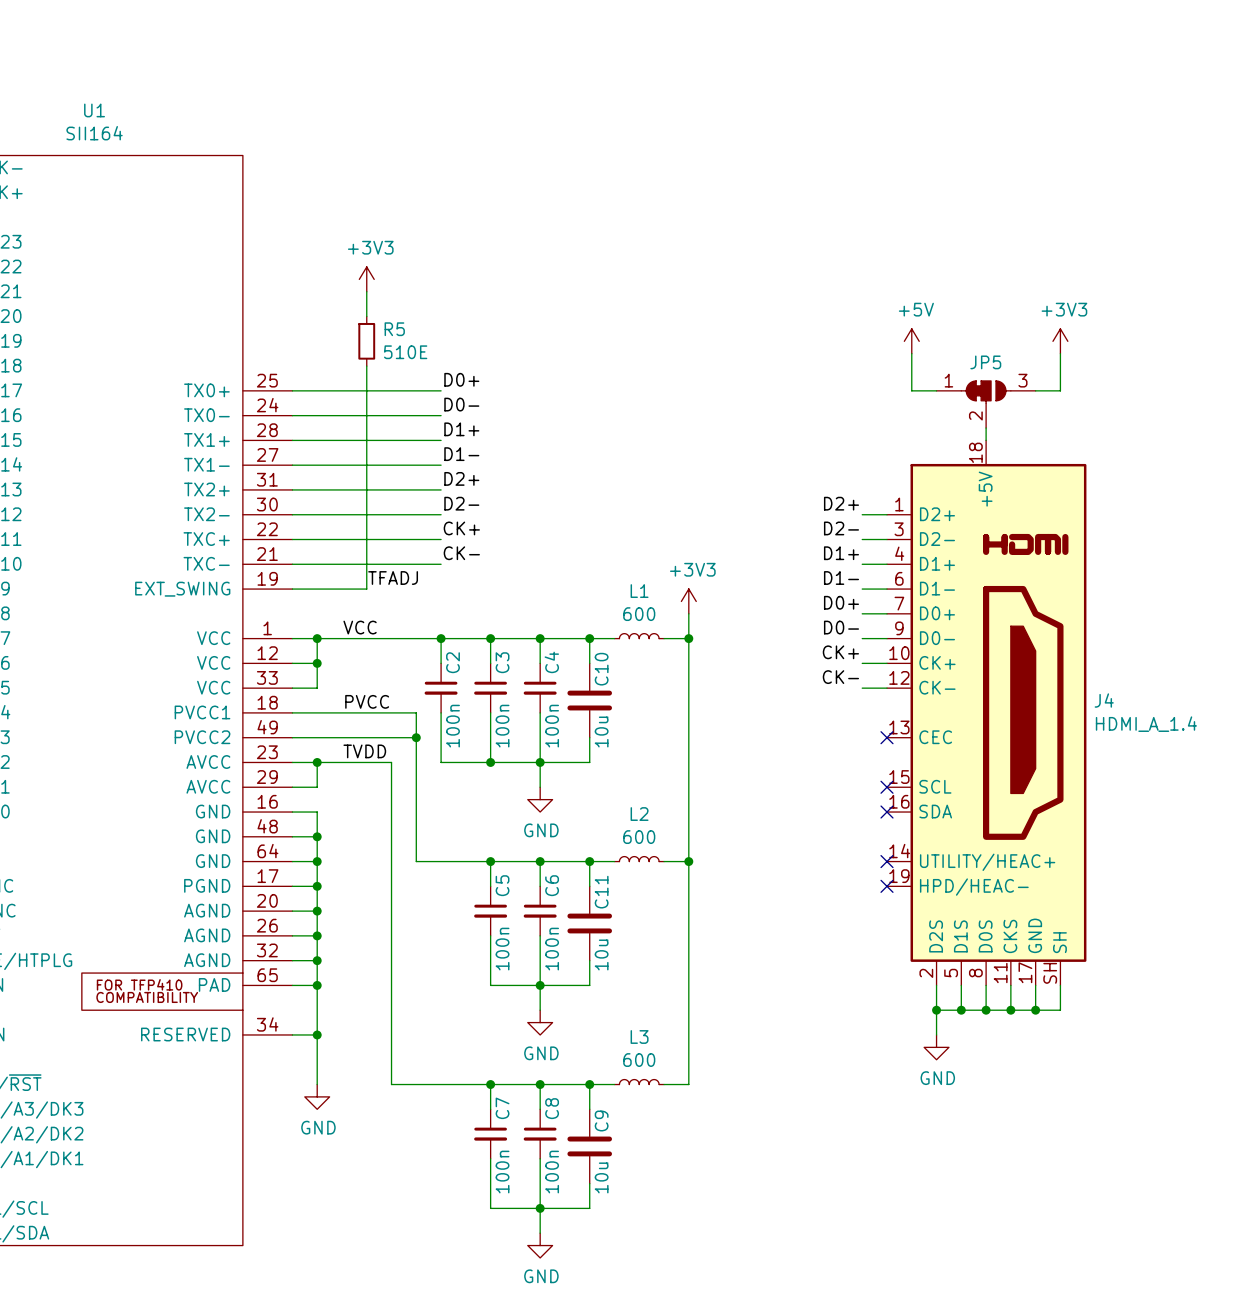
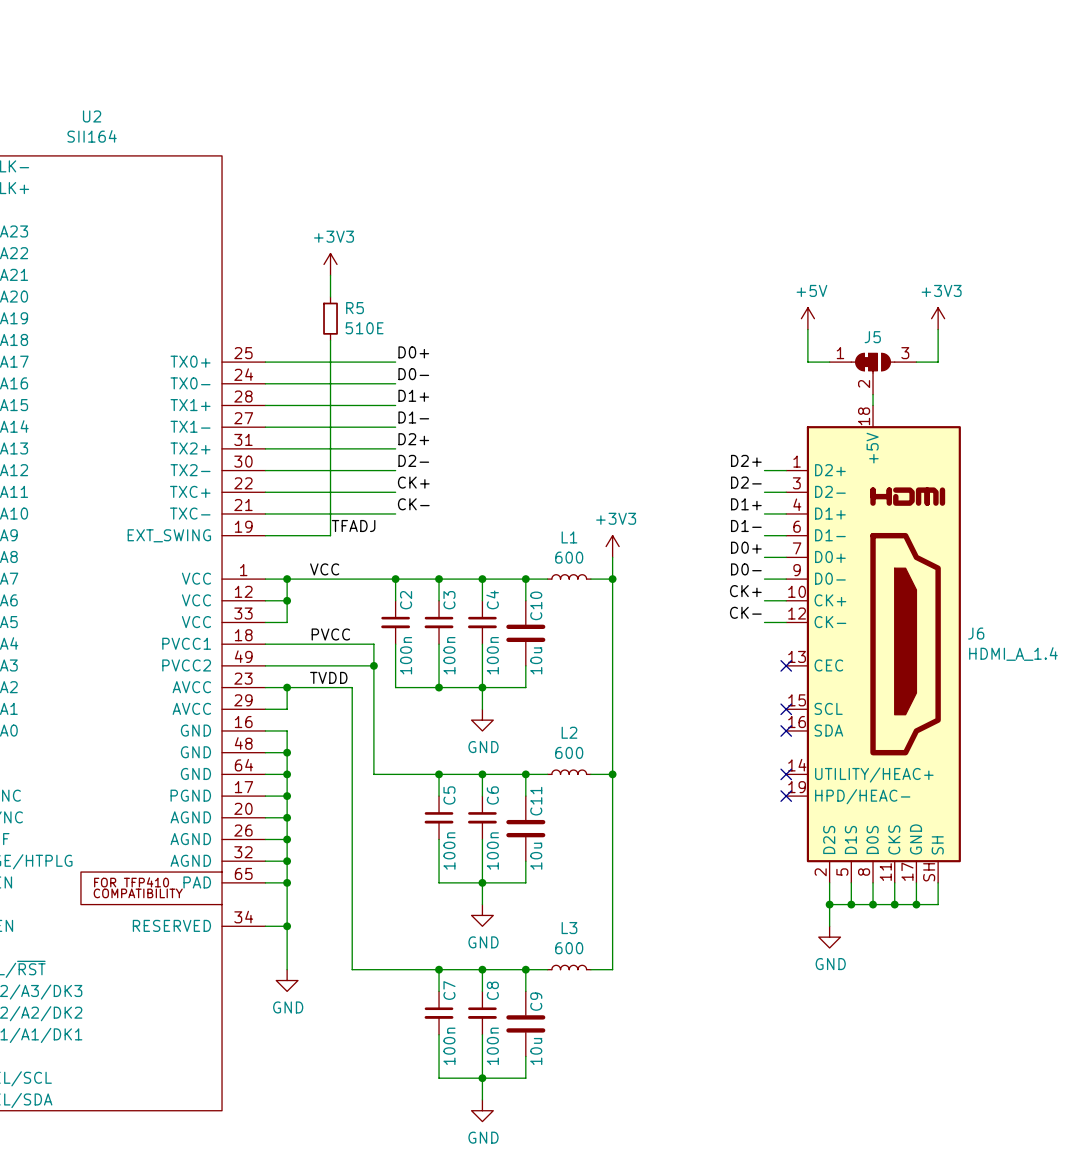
U1 name: U1 (94, 110) -> U2 (92, 116)
JP5 name: JP5 (985, 362) -> J5 (872, 337)
J4 name: J4 (1104, 700) -> J6 (976, 633)

